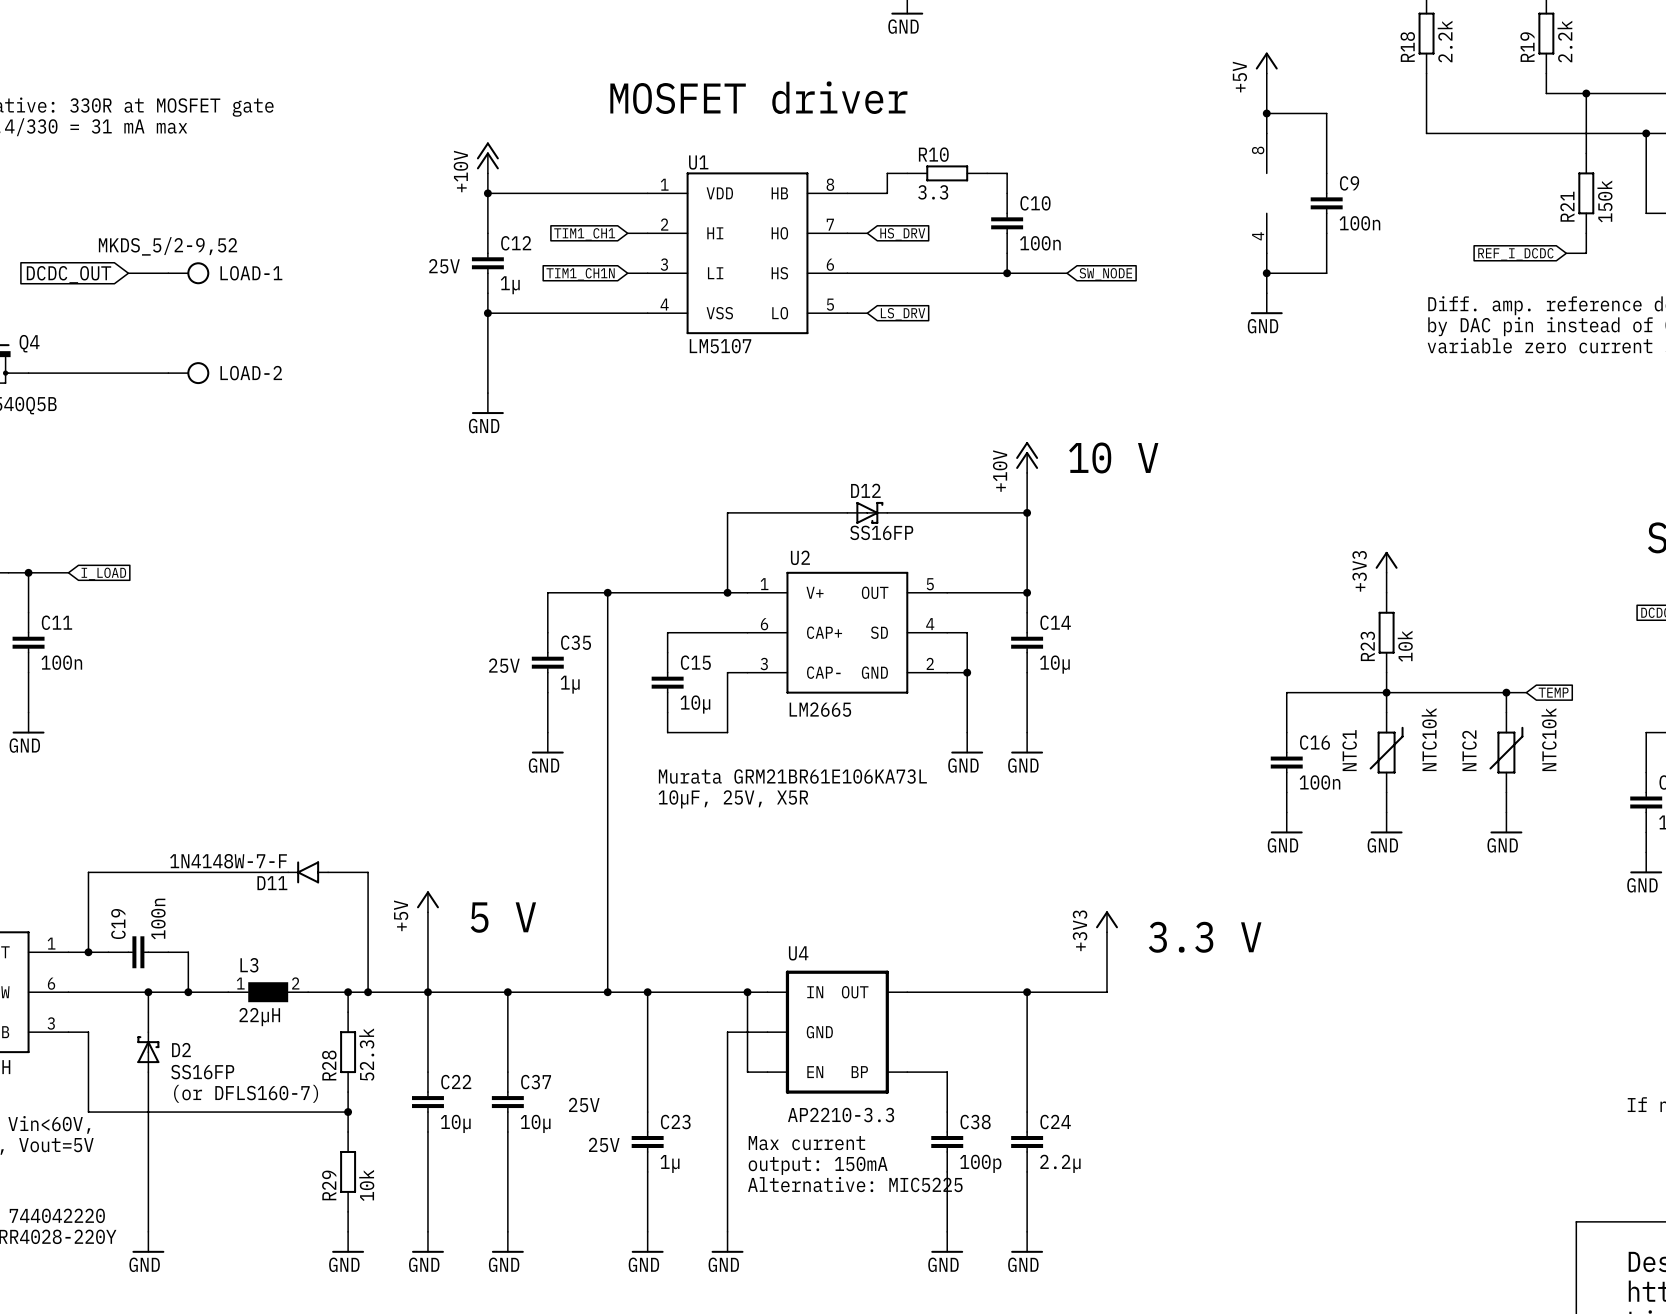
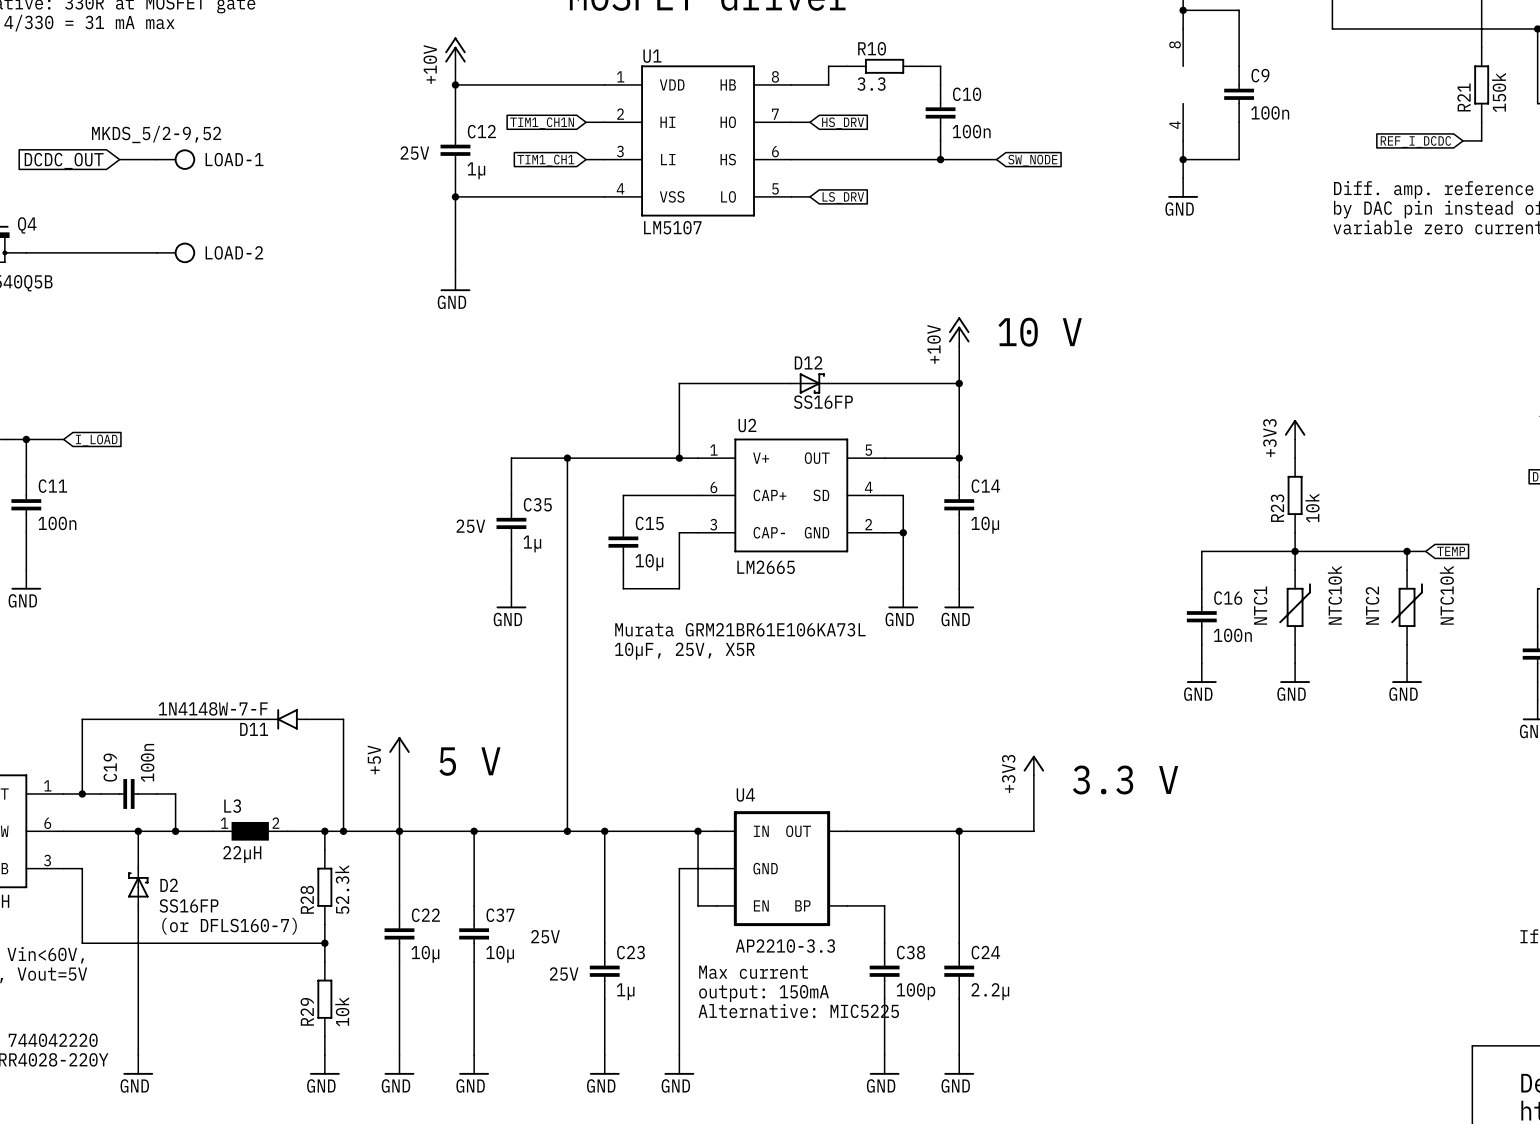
global label: TIM1_CH1 (584, 234) -> TIM1_CH1N (542, 123)
global label: TIM1_CH1N (580, 274) -> TIM1_CH1 (545, 160)

